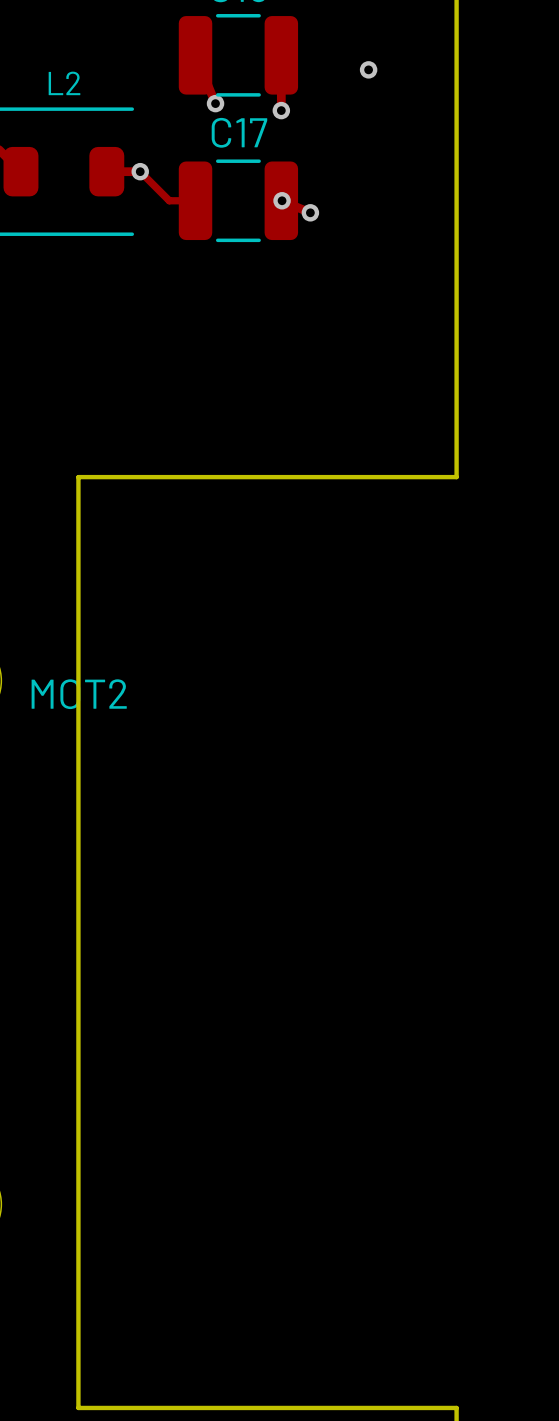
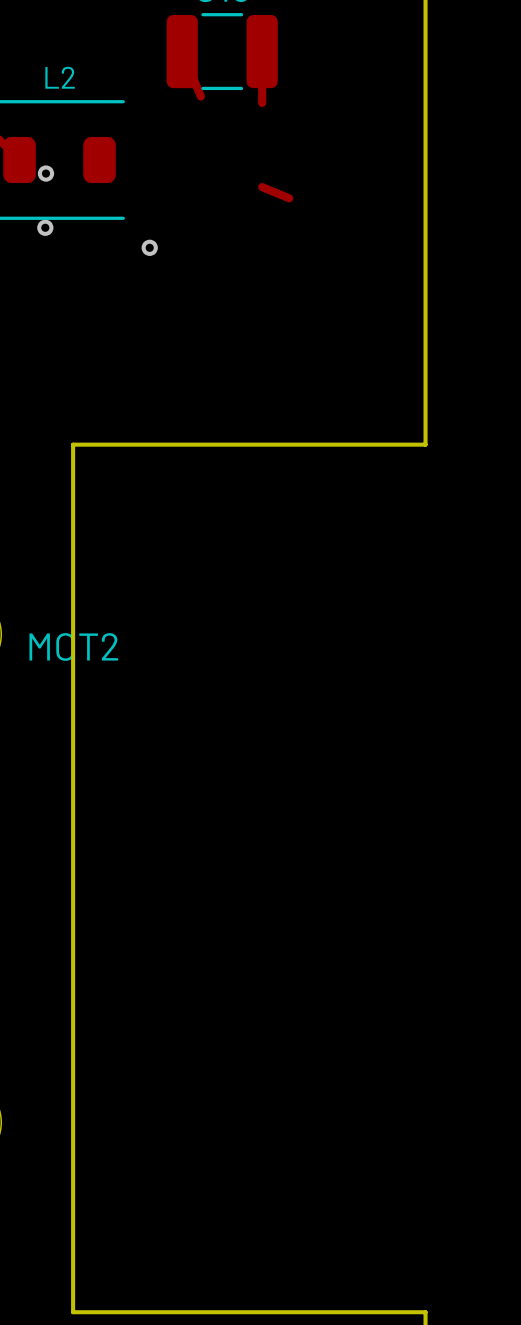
via: (368, 69) -> none
via: (215, 103) -> none
via: (281, 110) -> none
track: (106, 171) (140, 171) (169, 200) (195, 200) -> none
via: (140, 171) -> none
via: none -> (45, 173)
C17: (238, 200) -> none
via: (282, 200) -> none
via: (310, 212) -> none
via: none -> (45, 227)
via: none -> (149, 247)

